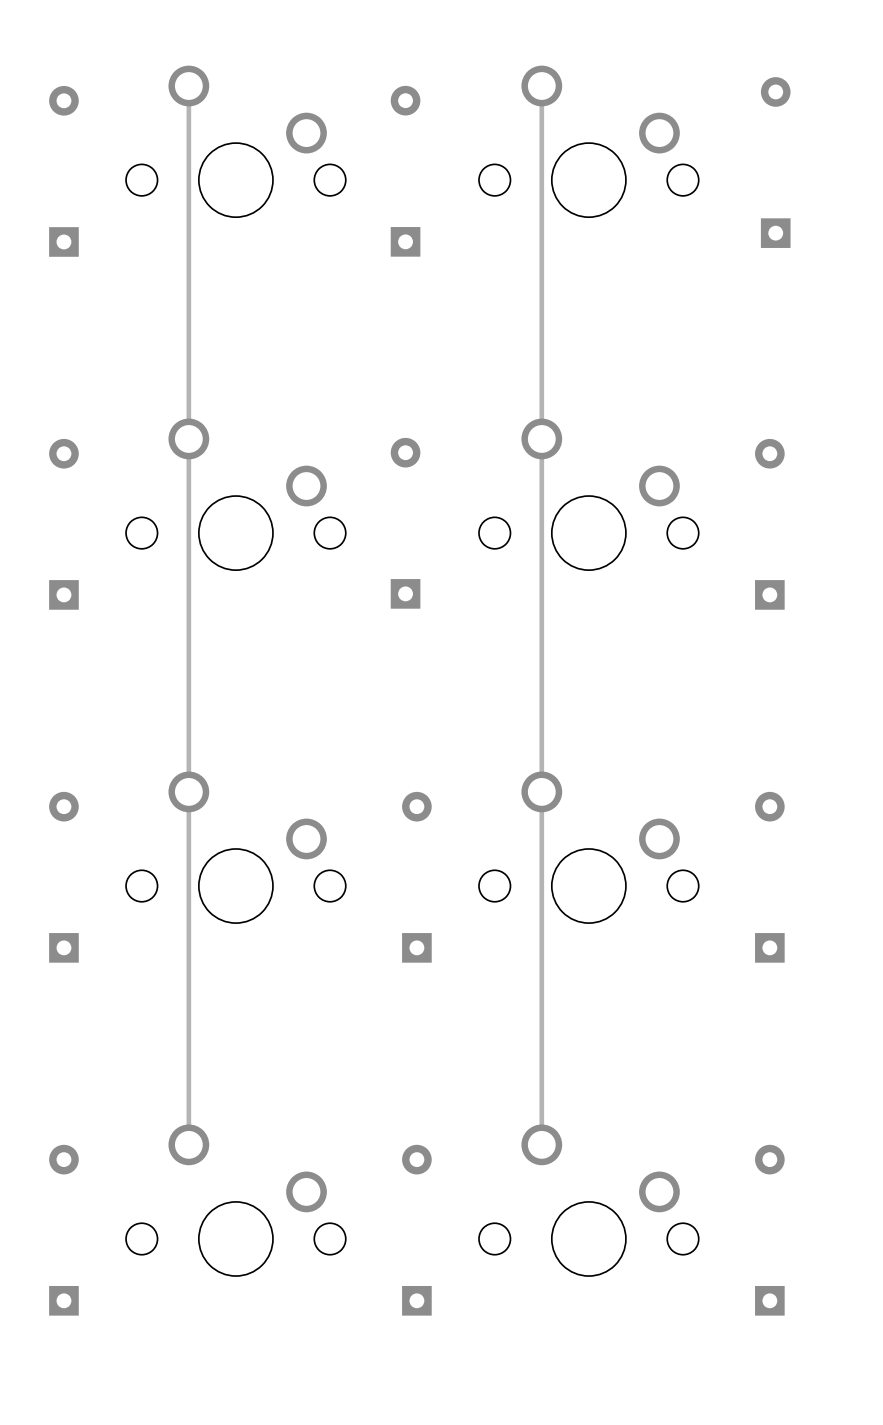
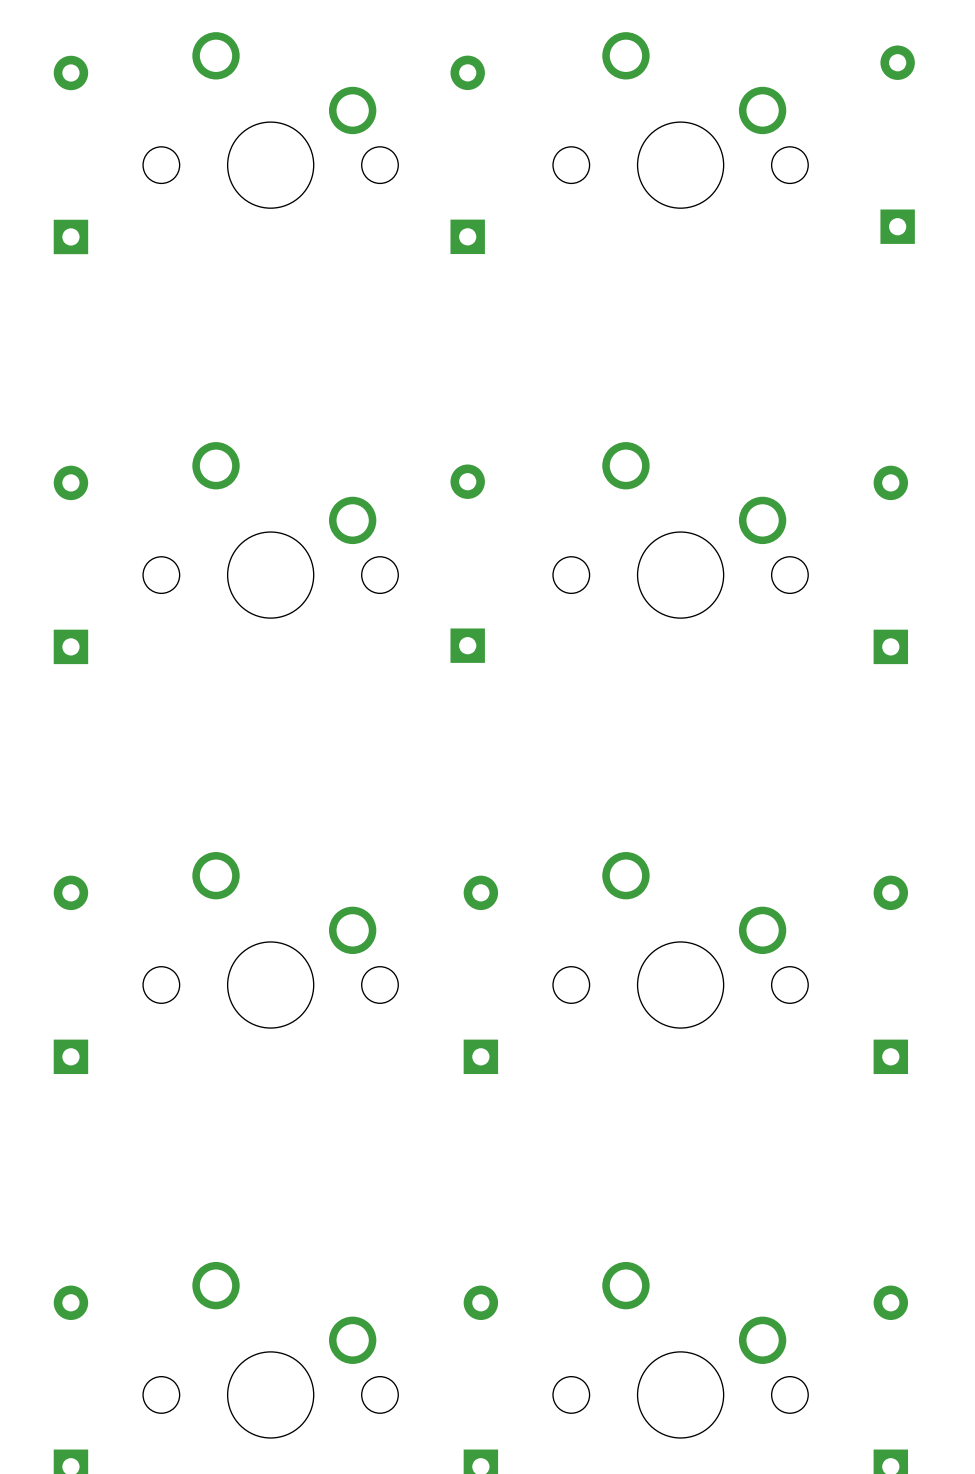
track: (188, 86) (188, 1144) -> none
track: (541, 86) (541, 1144) -> none

